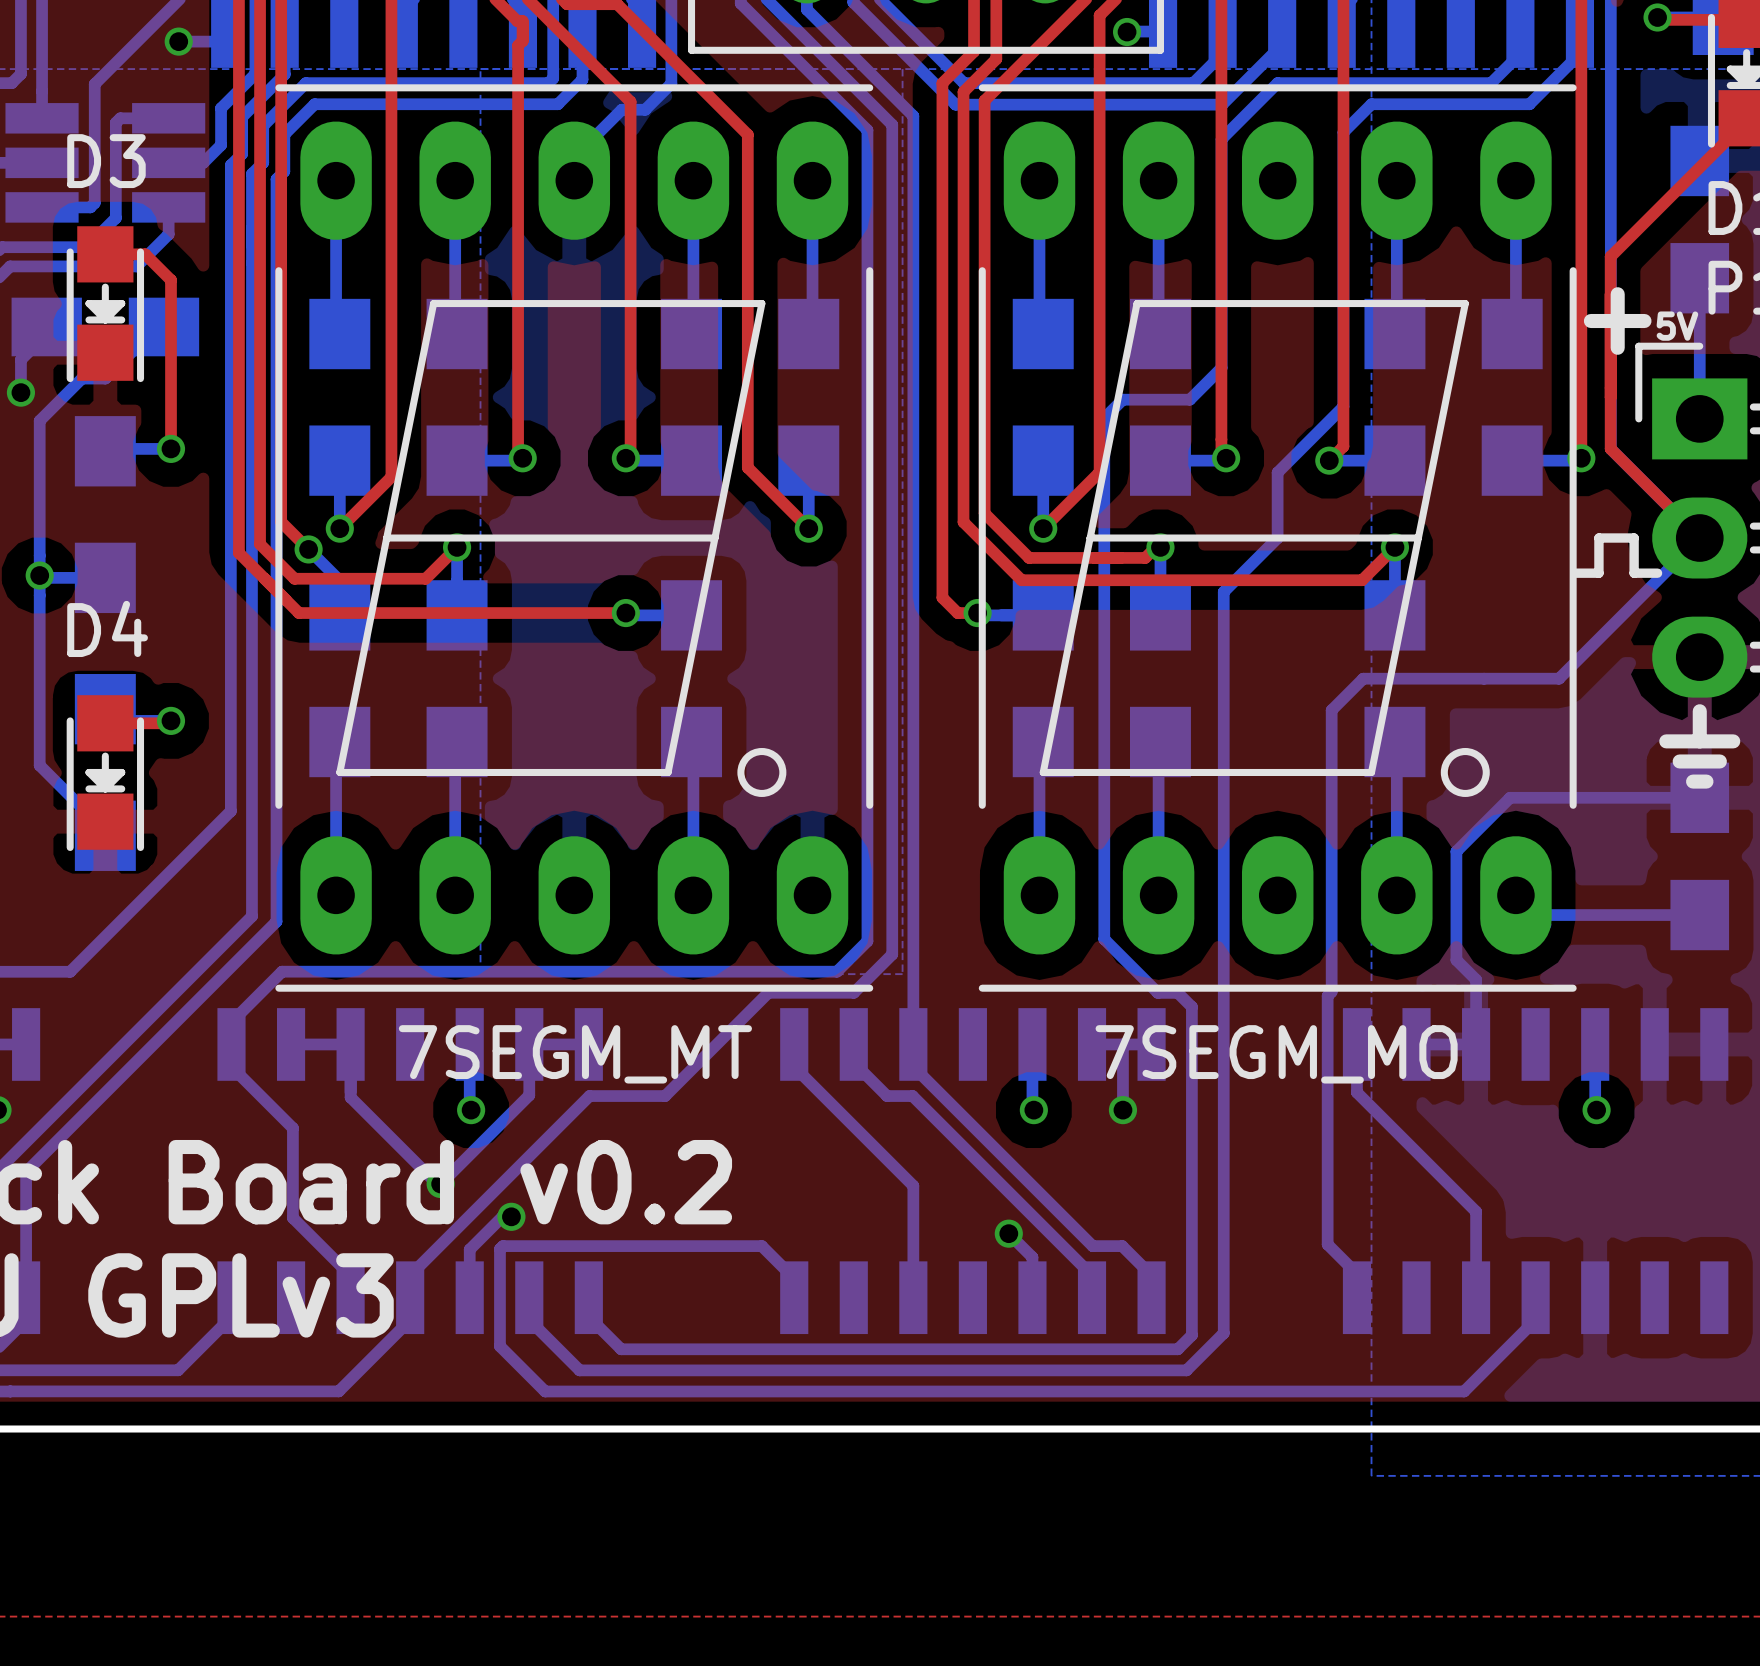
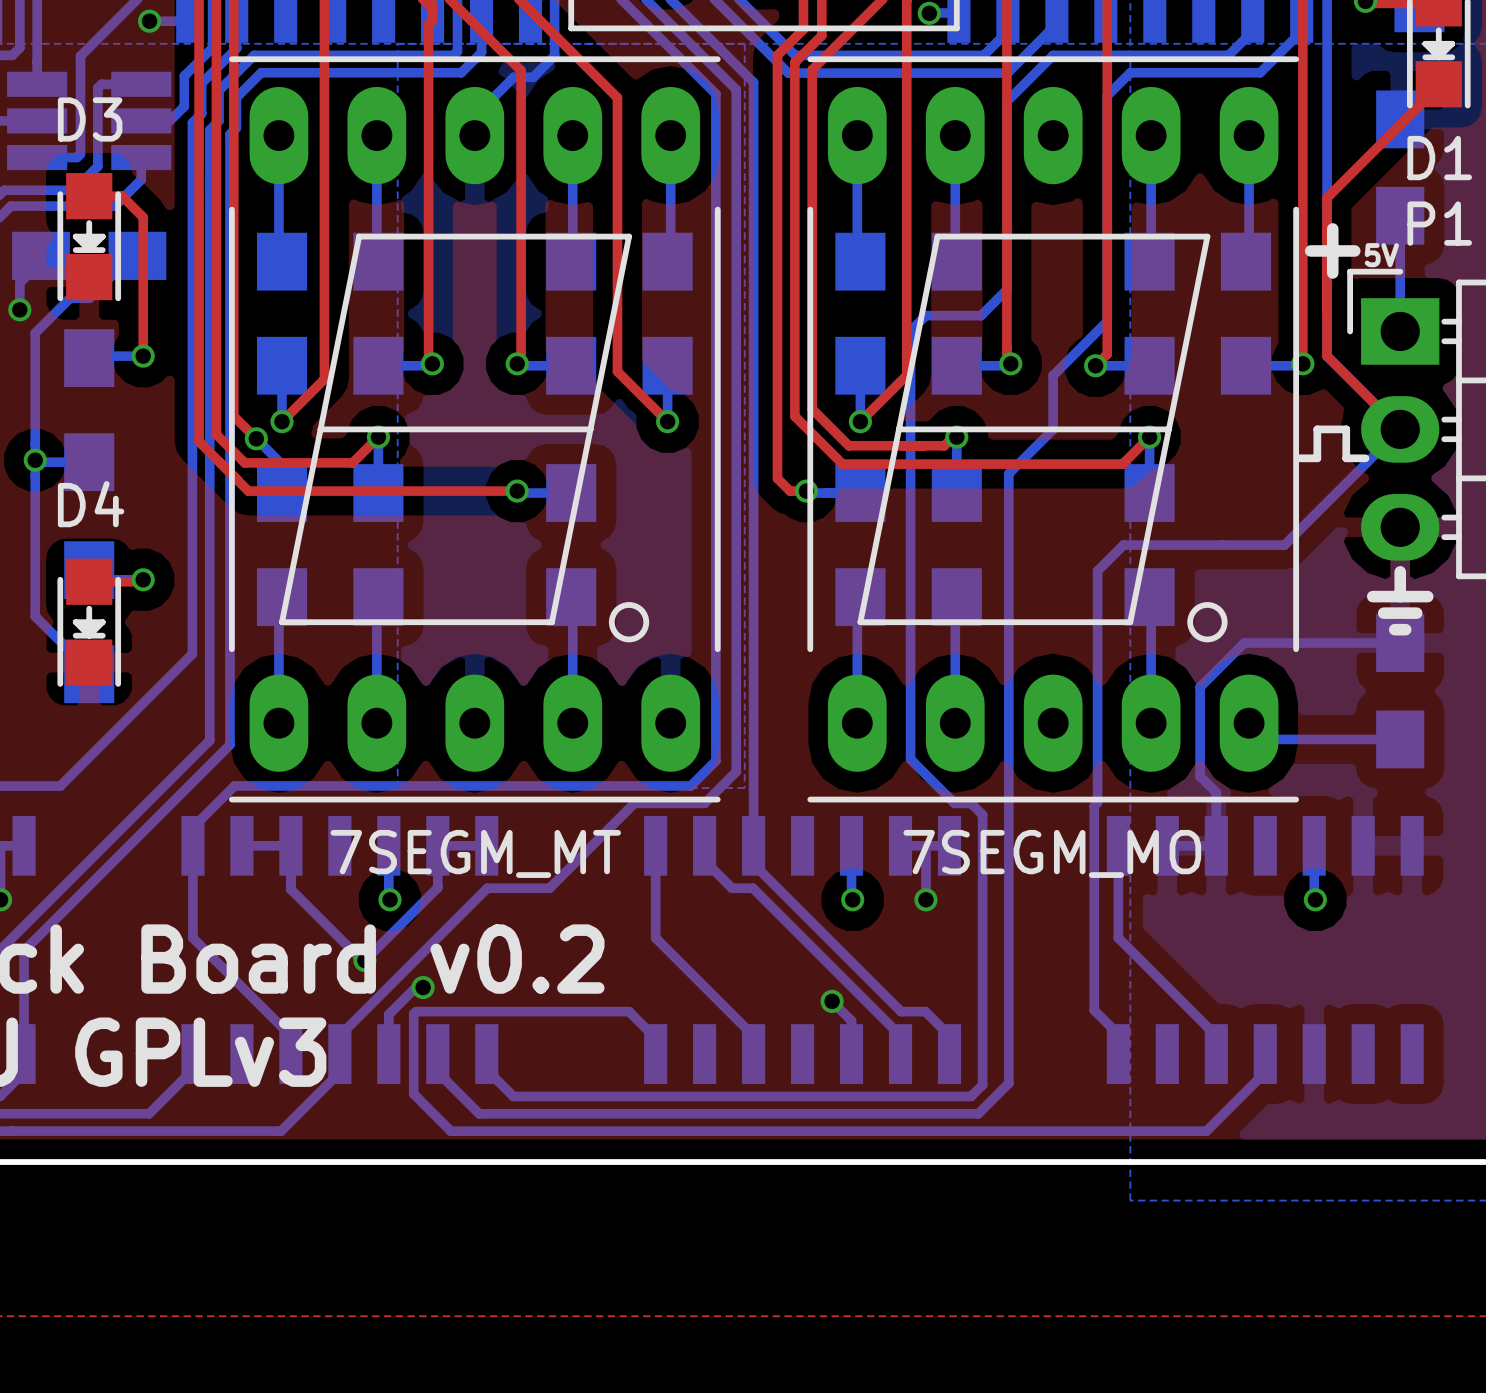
bottom track: (231, 1066) (292, 1128) (292, 1217) -> (192, 864) (192, 937) (243, 988)
bottom track: (794, 1066) (913, 1185) (913, 1275) -> (655, 864) (655, 937) (753, 1035)
bottom track: (1356, 1092) (1476, 1211) (1476, 1275) -> (1118, 885) (1118, 937) (1216, 1035)

